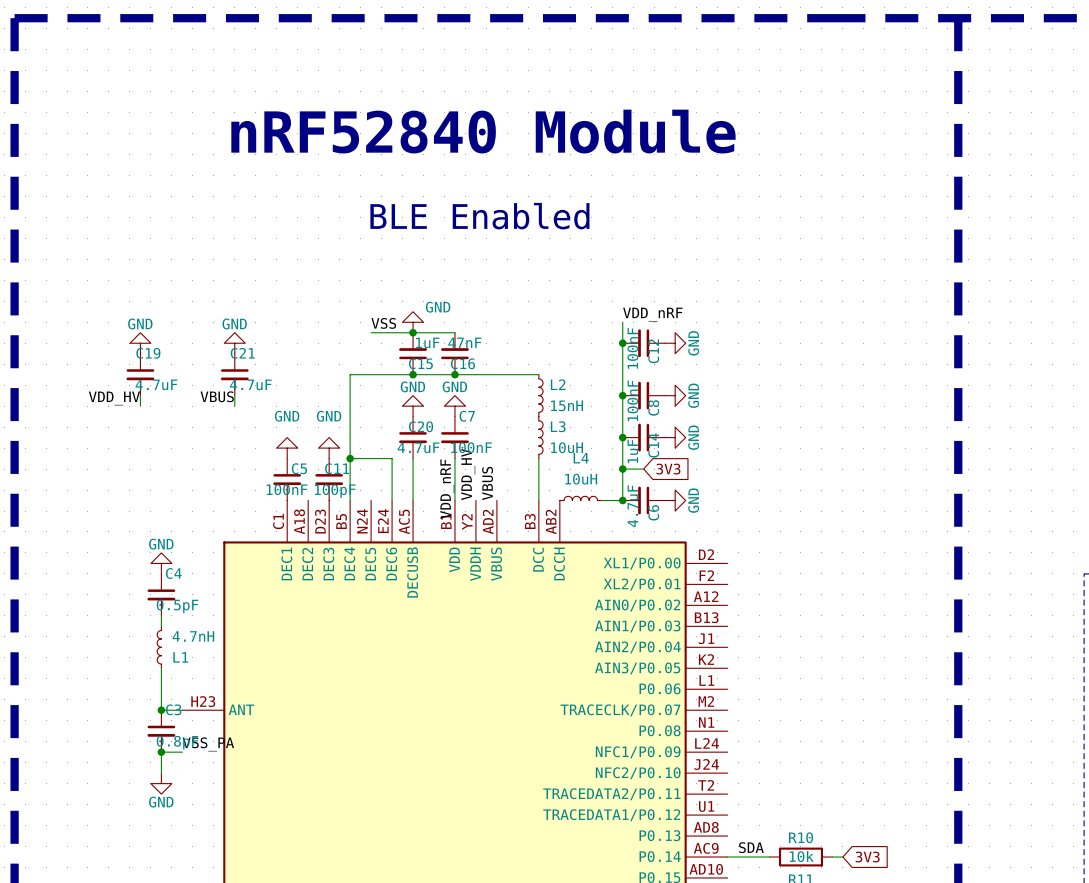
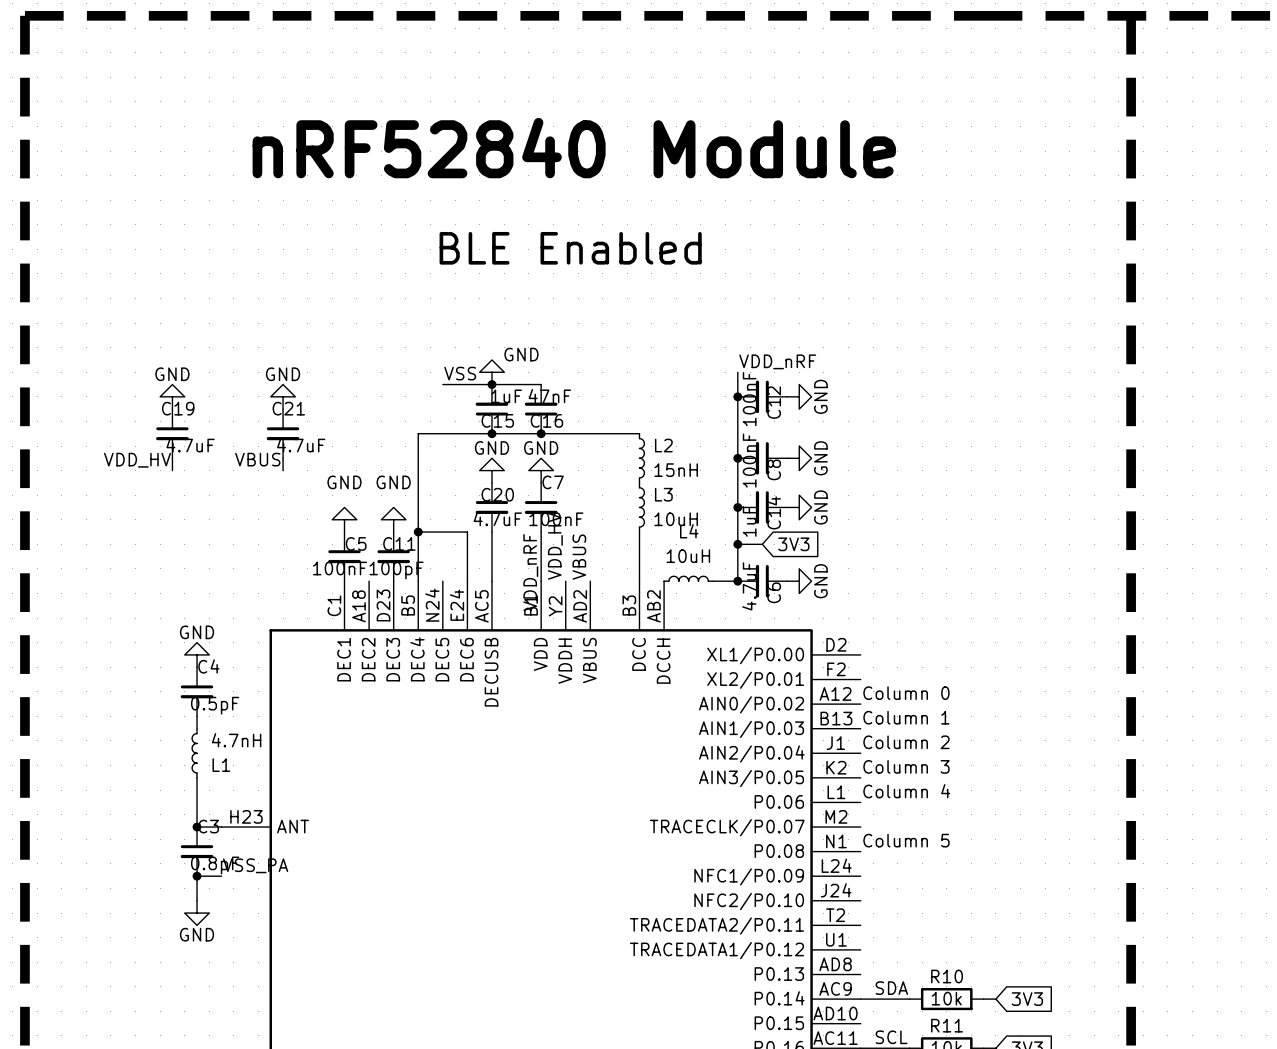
label: none -> Column 0 (906, 693)
label: none -> Column 1 (906, 717)
label: none -> Column 2 (906, 742)
label: none -> Column 3 (906, 766)
label: none -> Column 4 (906, 791)
label: none -> Column 5 (906, 840)

